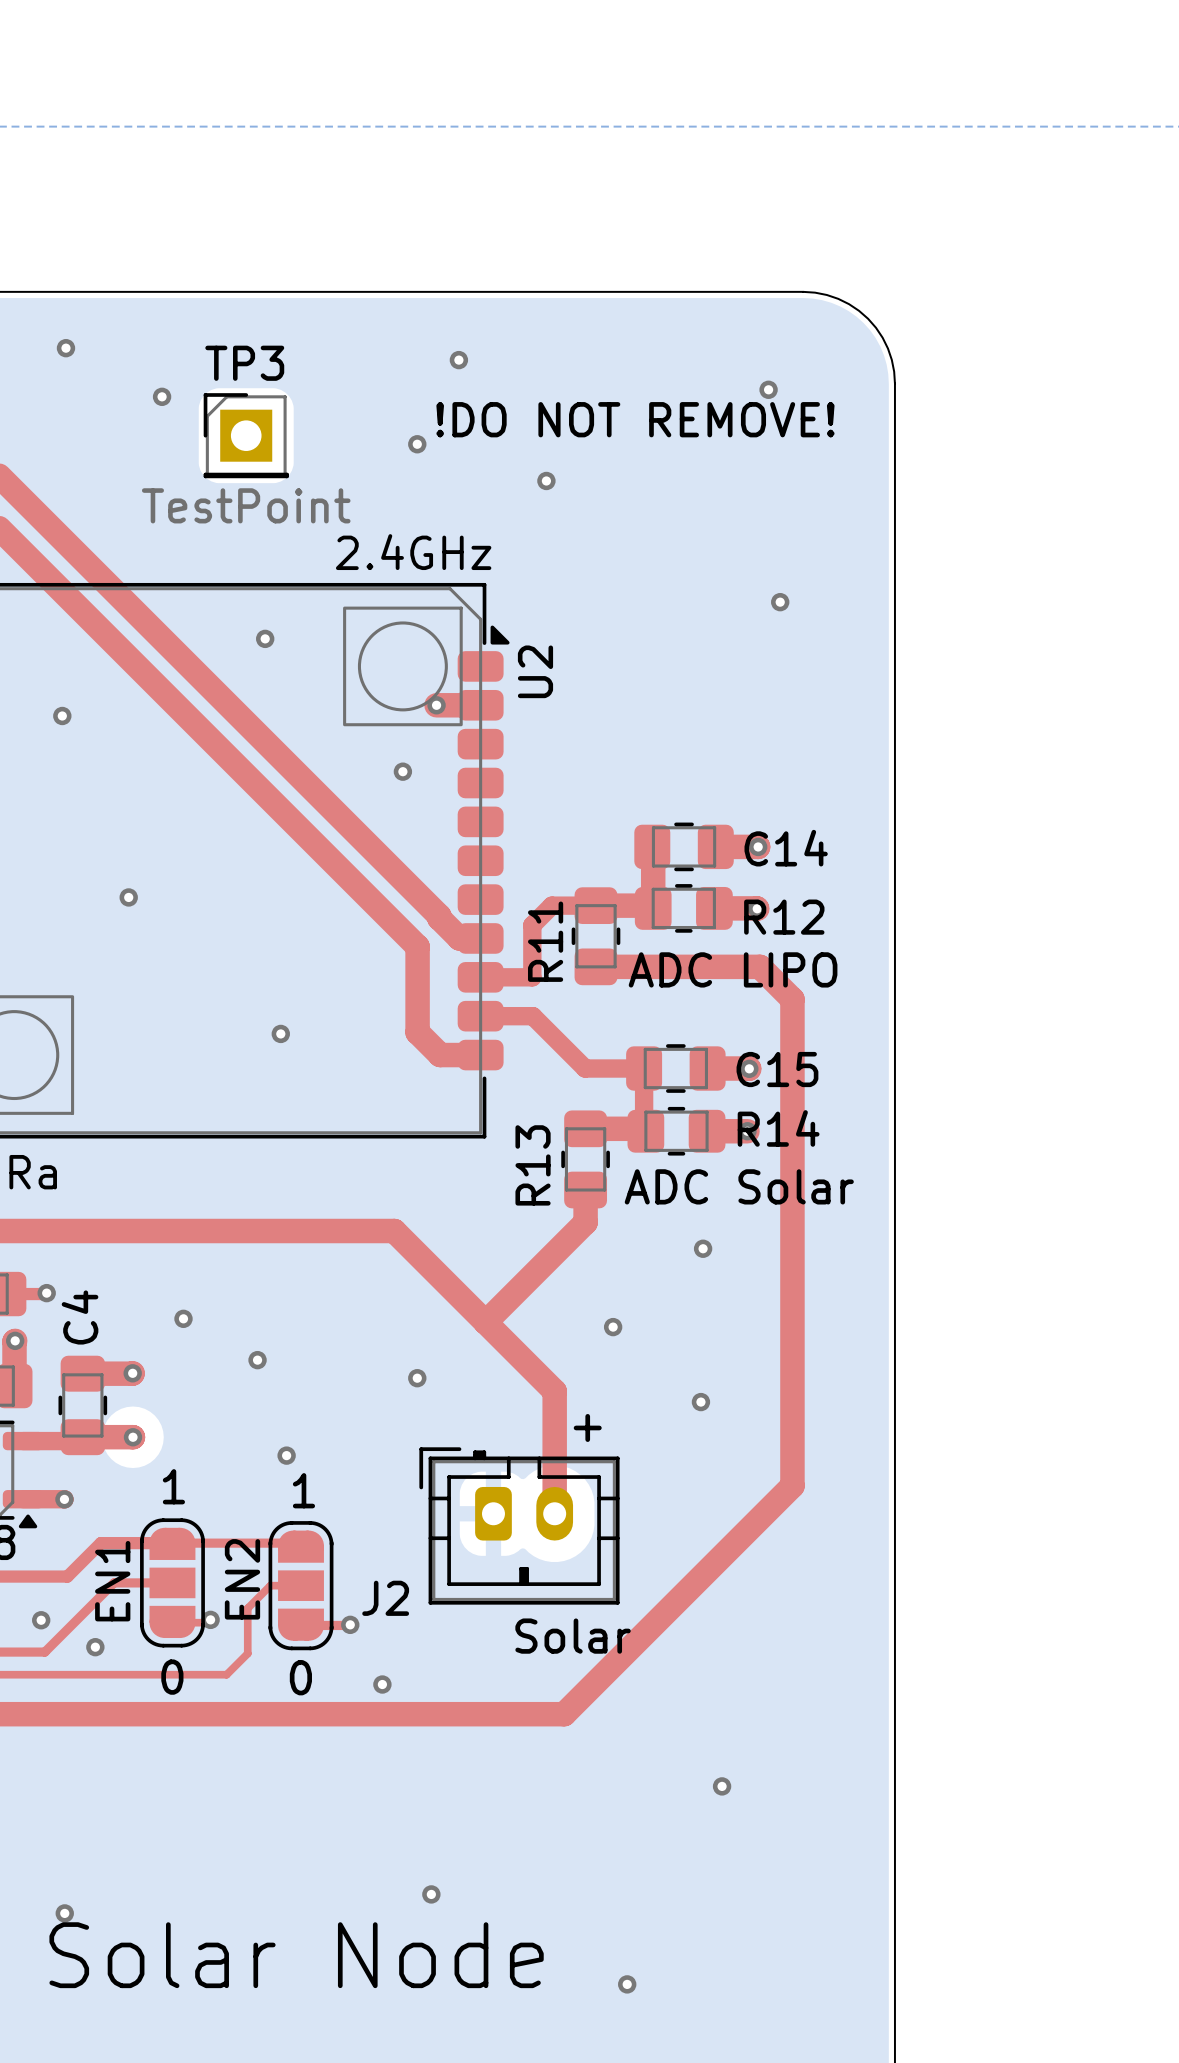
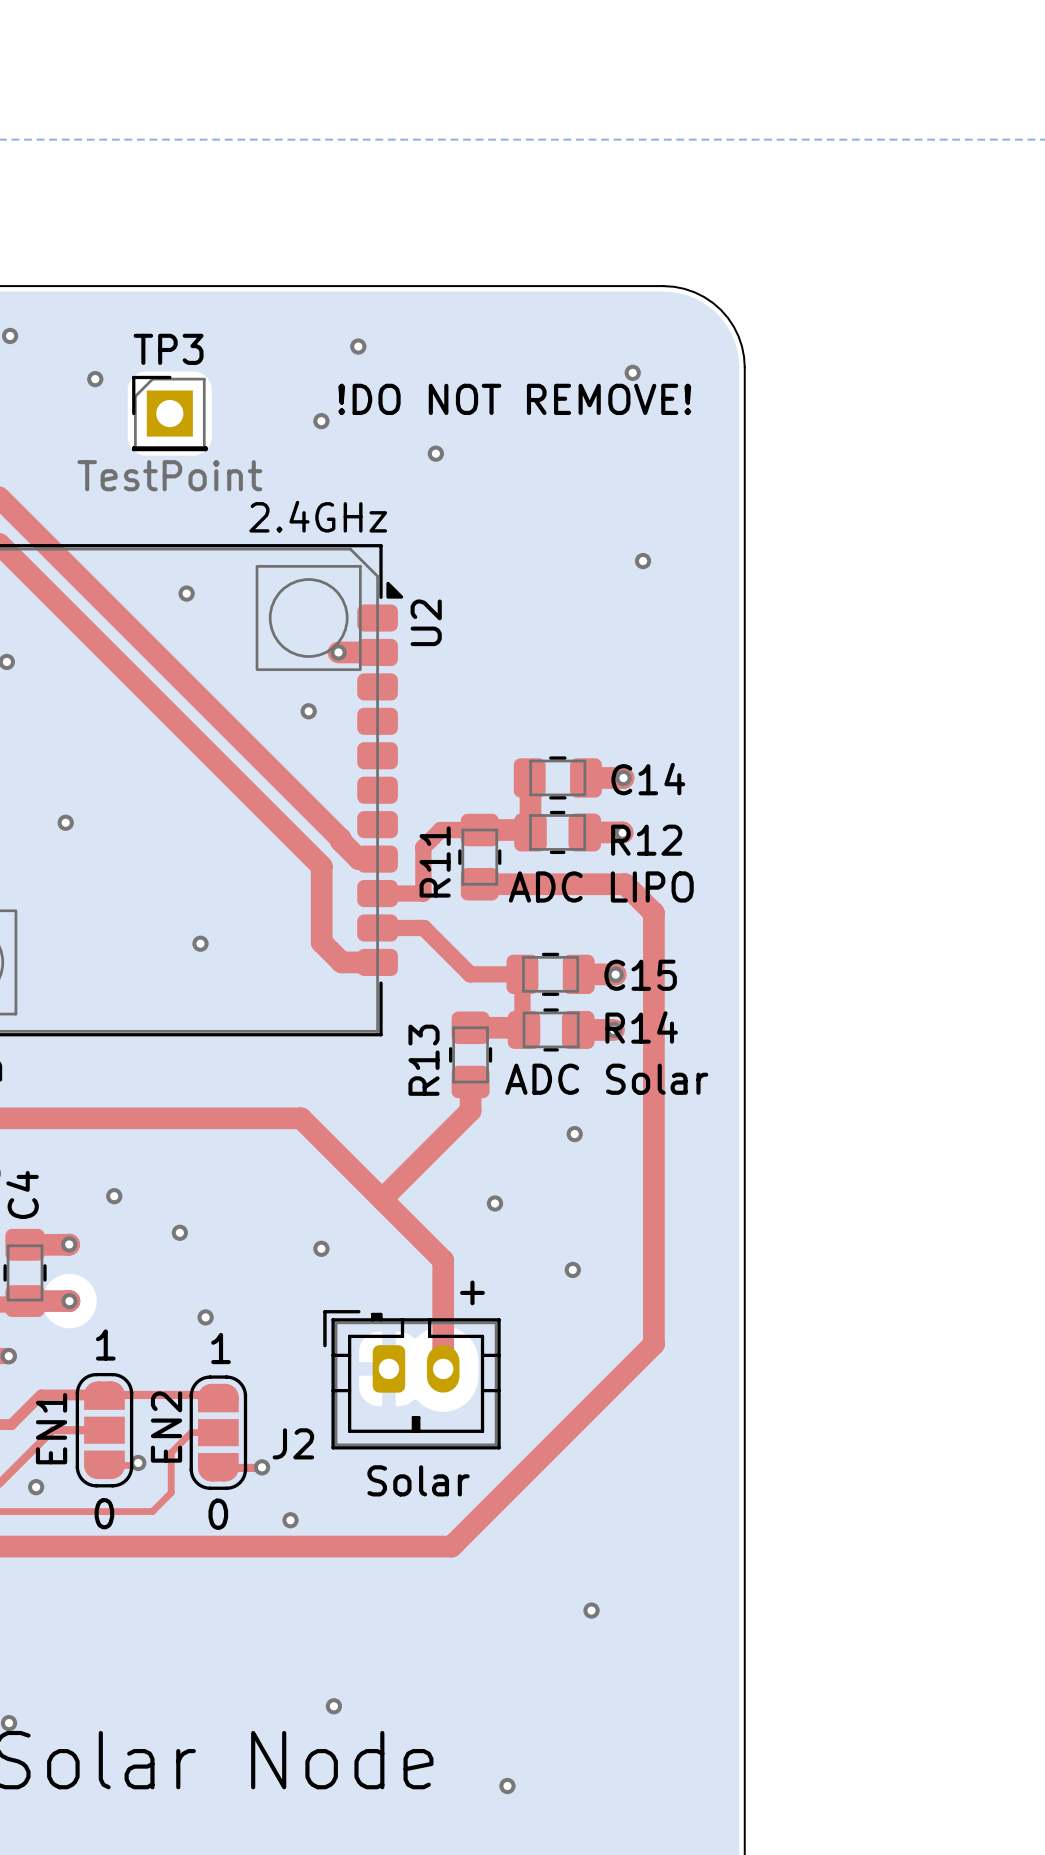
text position: Solar (573, 1636) -> Solar (418, 1480)

